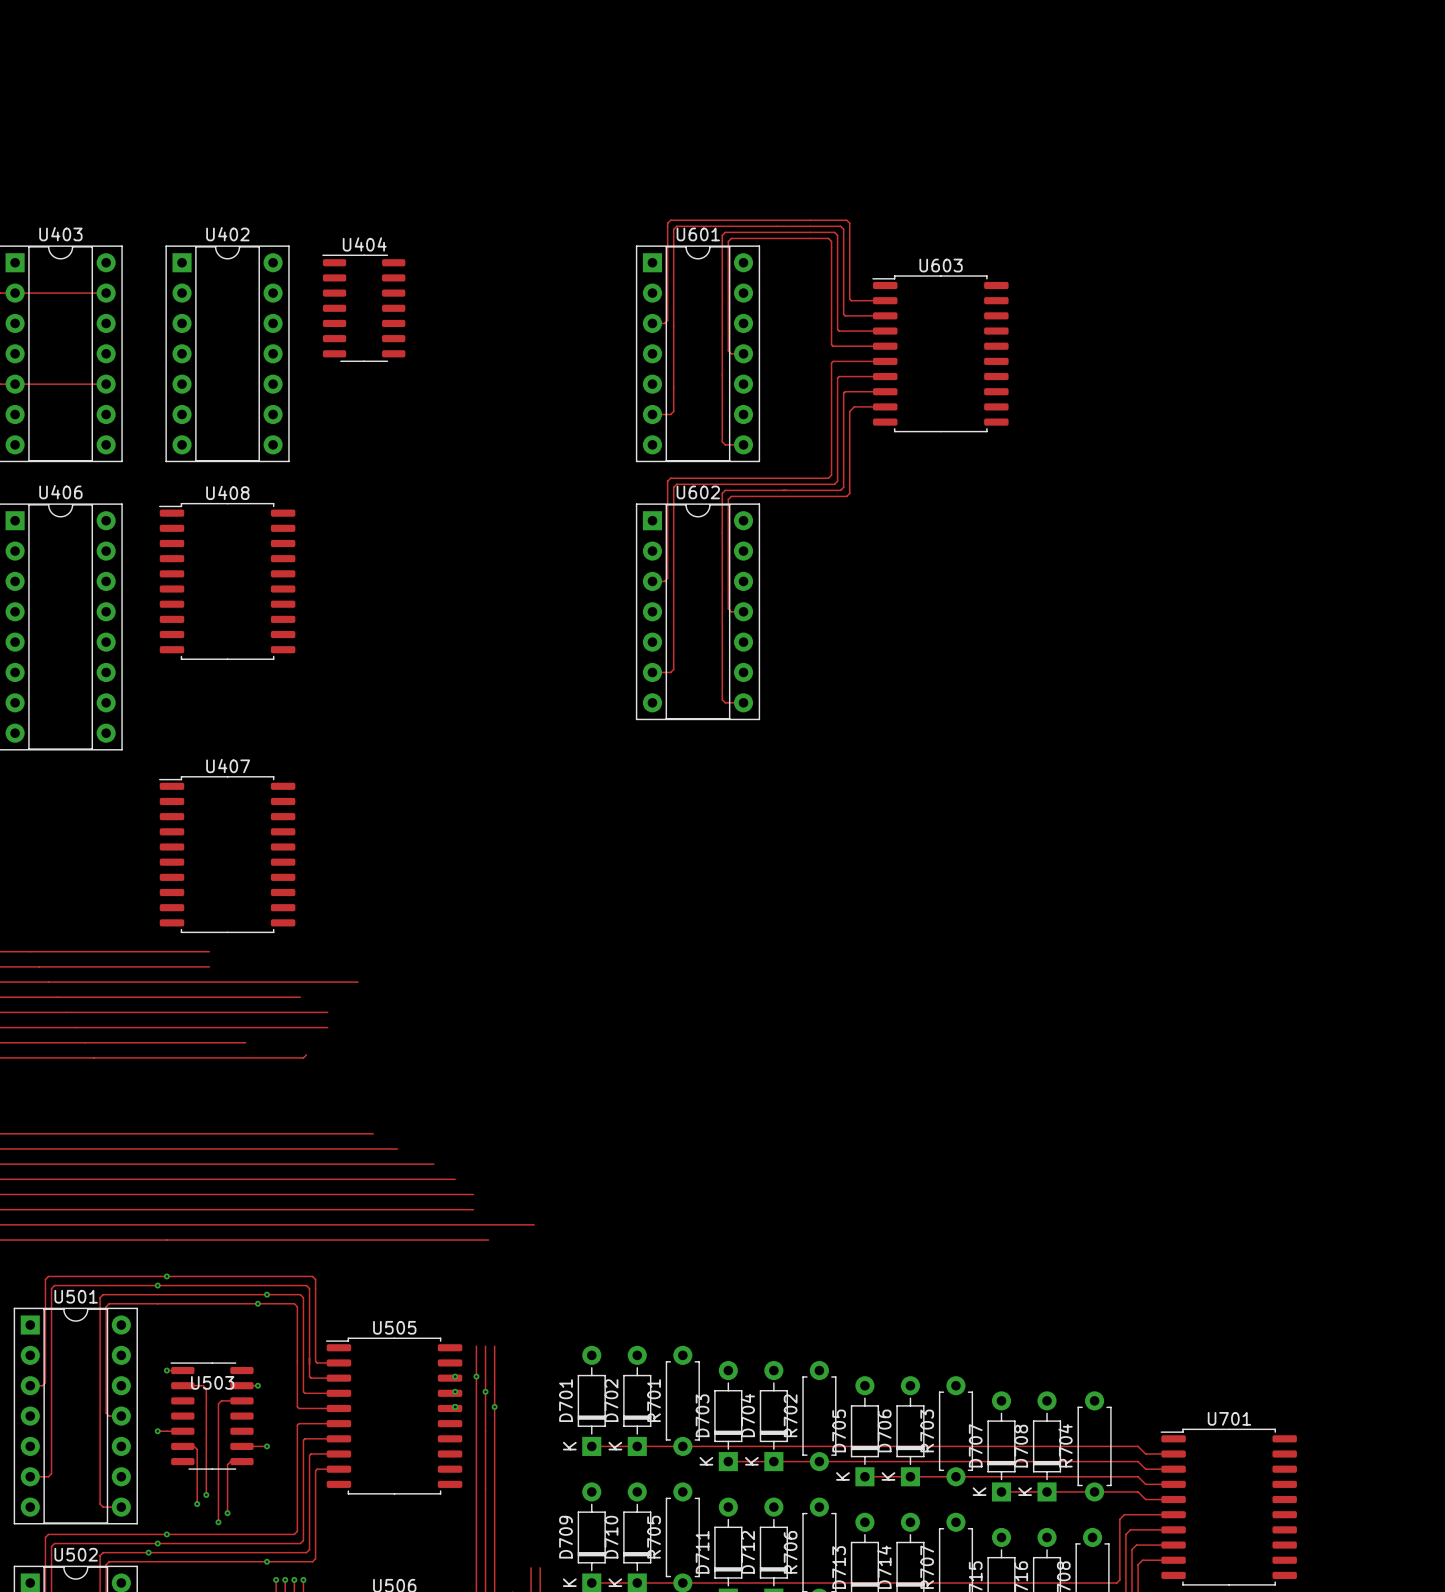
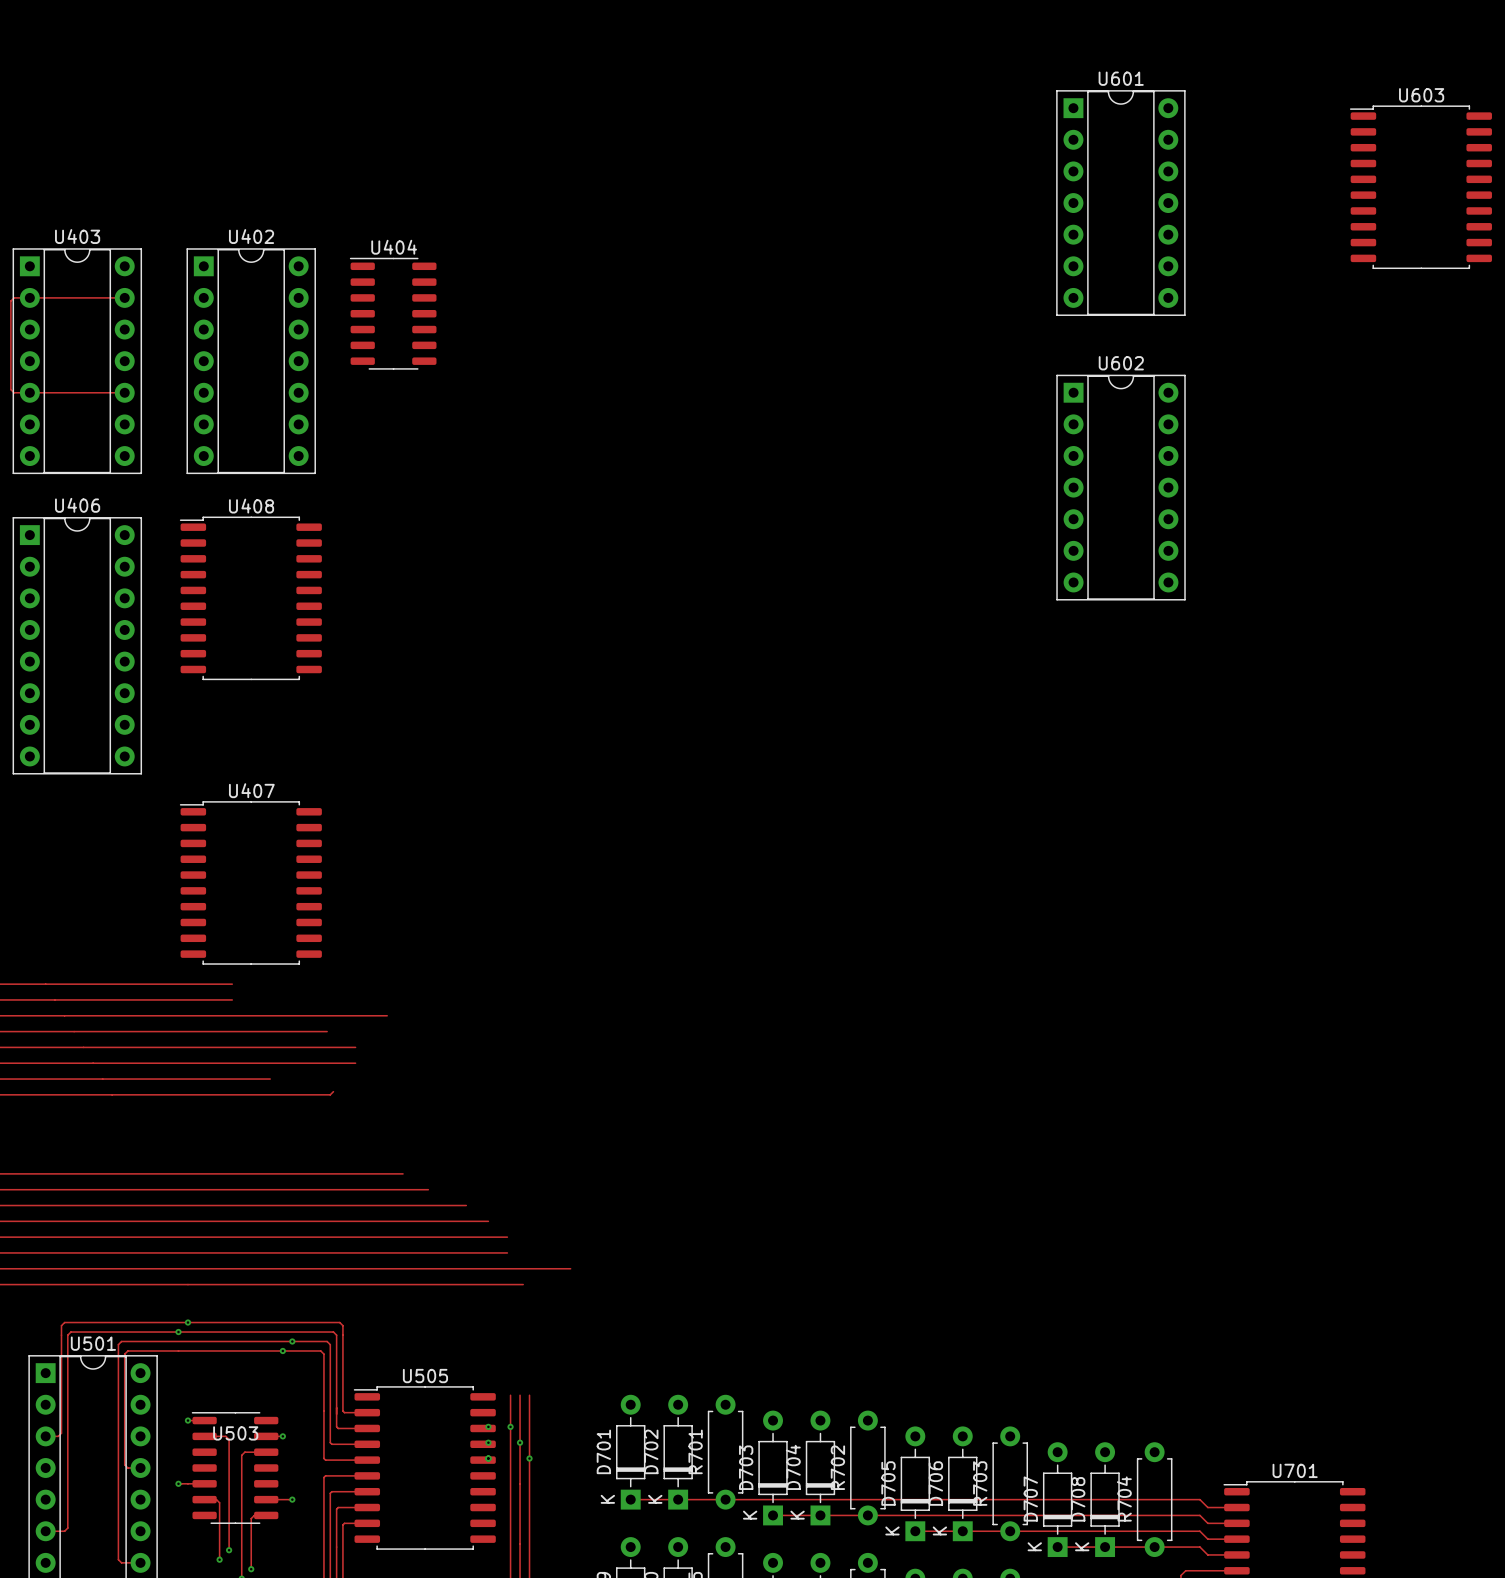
track: (885, 300) (849, 299) (849, 223) (846, 220) (670, 220) (667, 223) (667, 320) (664, 323) (652, 323) -> none
track: (885, 315) (843, 314) (843, 229) (840, 226) (676, 226) (673, 229) (673, 411) (670, 414) (652, 414) -> none
track: (885, 331) (837, 329) (837, 235) (834, 232) (725, 232) (722, 235) (722, 441) (725, 444) (743, 444) -> none
track: (885, 346) (831, 344) (831, 241) (828, 238) (731, 238) (728, 241) (728, 350) (731, 353) (743, 353) -> none
U601 position: (697, 353) -> (1120, 203)
U603 position: (940, 353) -> (1420, 187)
track: (885, 361) (831, 362) (831, 475) (828, 478) (670, 478) (667, 481) (667, 578) (664, 581) (652, 581) -> none
track: (885, 376) (837, 378) (837, 481) (834, 484) (676, 484) (673, 487) (673, 669) (670, 672) (652, 672) -> none
track: (885, 391) (843, 393) (843, 487) (840, 490) (725, 490) (722, 493) (722, 699) (725, 702) (743, 702) -> none
track: (885, 406) (854, 406) (849, 411) (849, 493) (846, 496) (731, 496) (728, 499) (728, 608) (731, 611) (743, 611) -> none
U602 position: (697, 611) -> (1121, 487)

